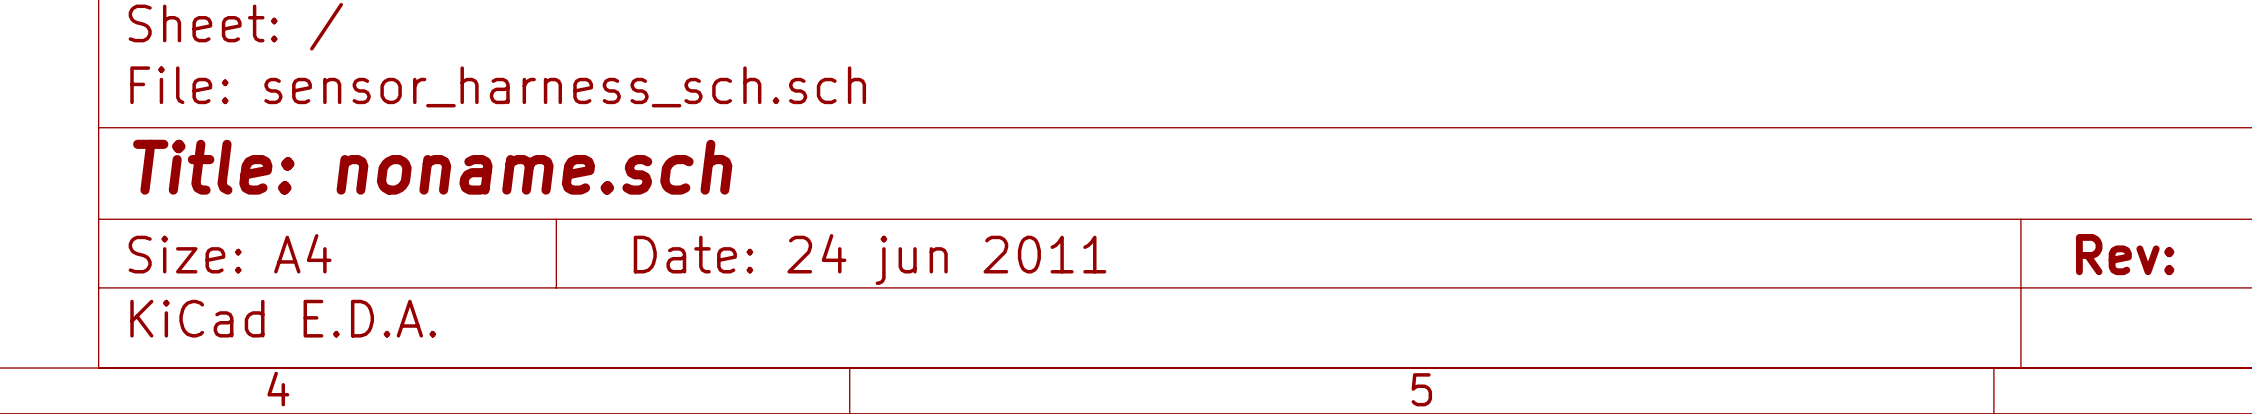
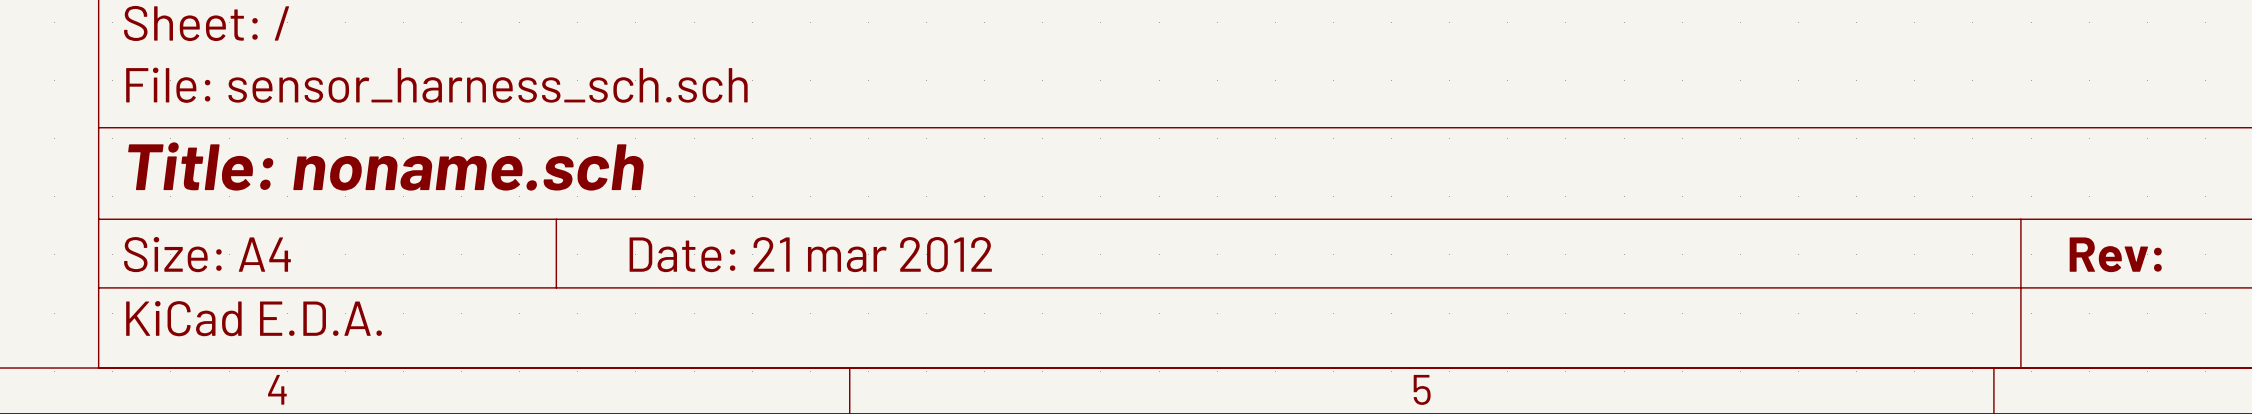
title block: Date: 24 jun 2011 (870, 259) -> Date: 21 mar 2012 (810, 254)

